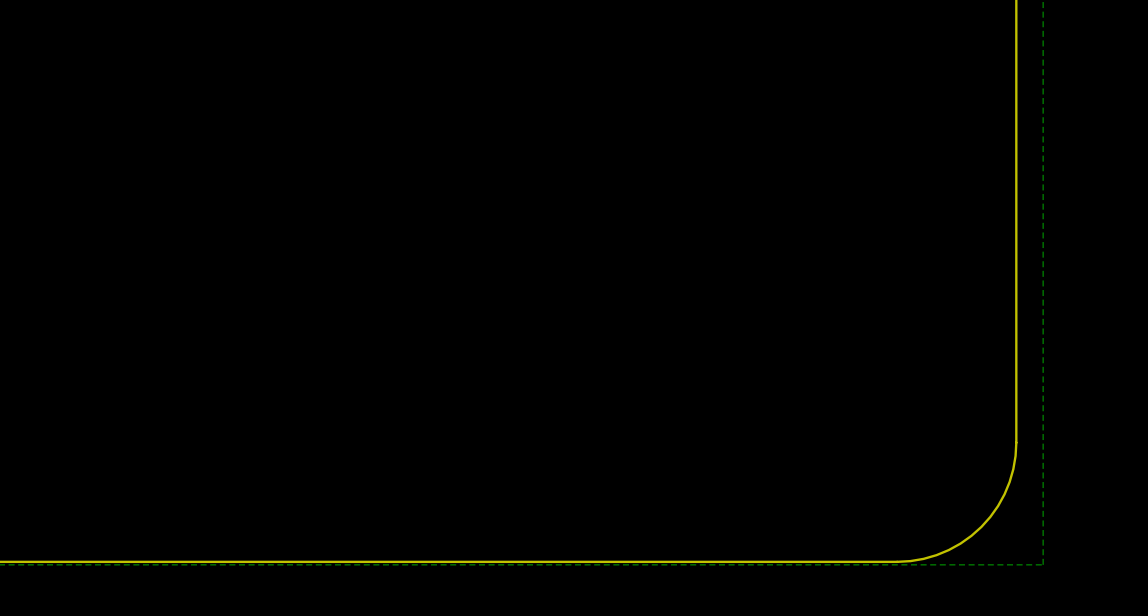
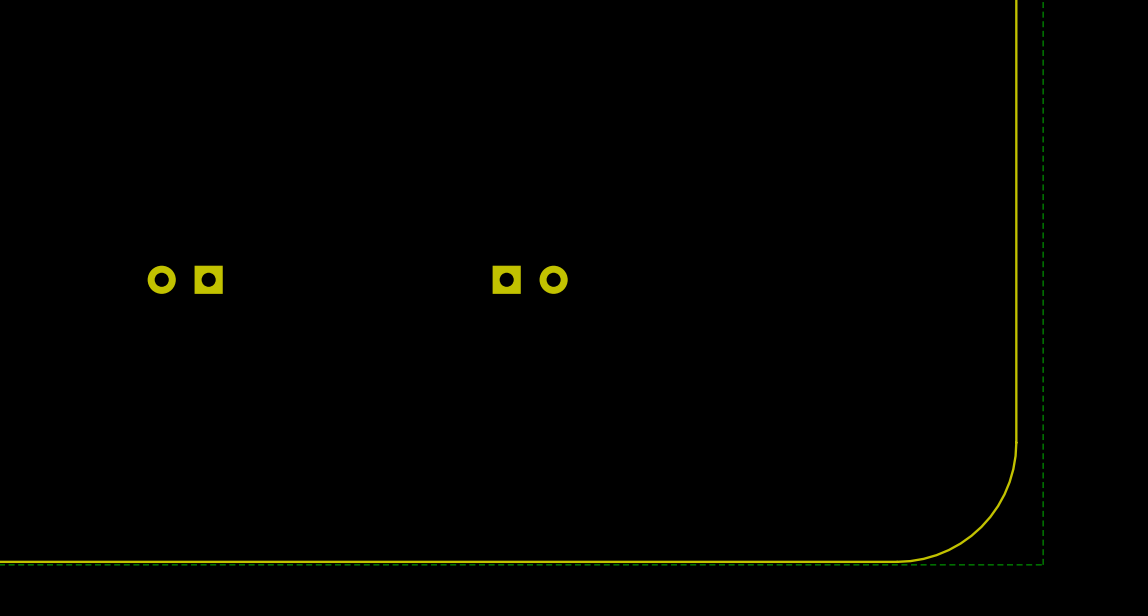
part: none -> (185, 279)
part: none -> (530, 279)

